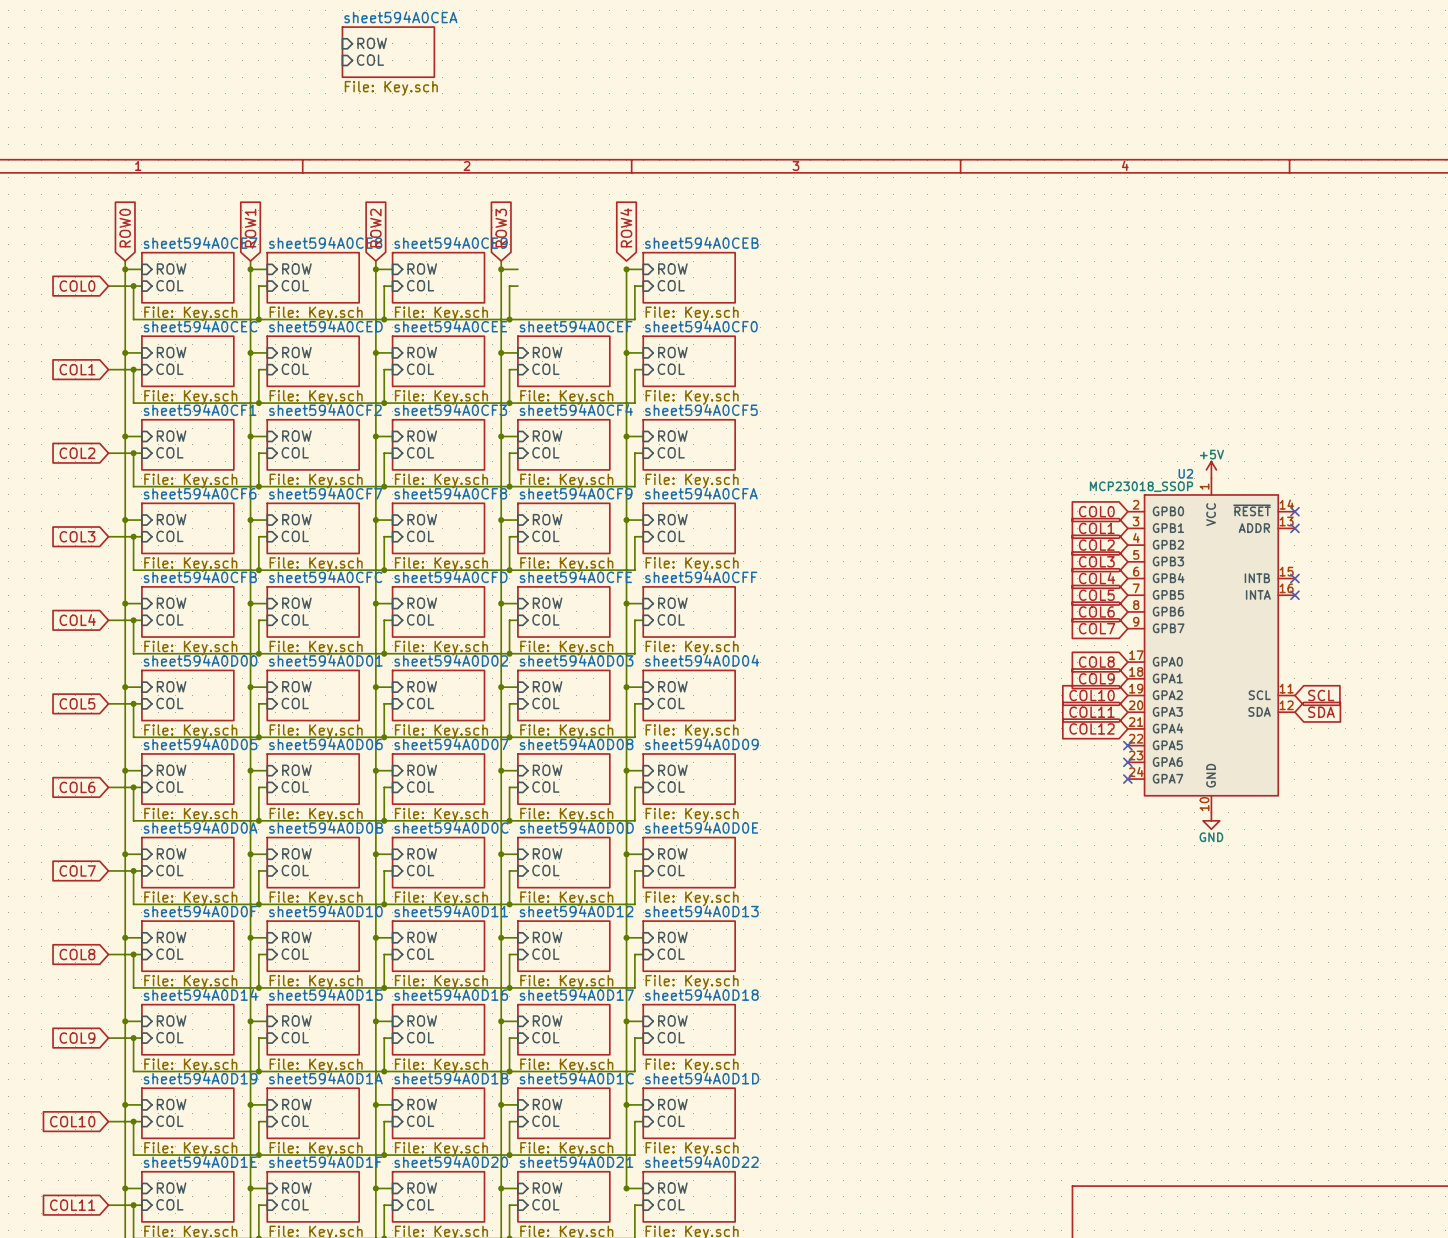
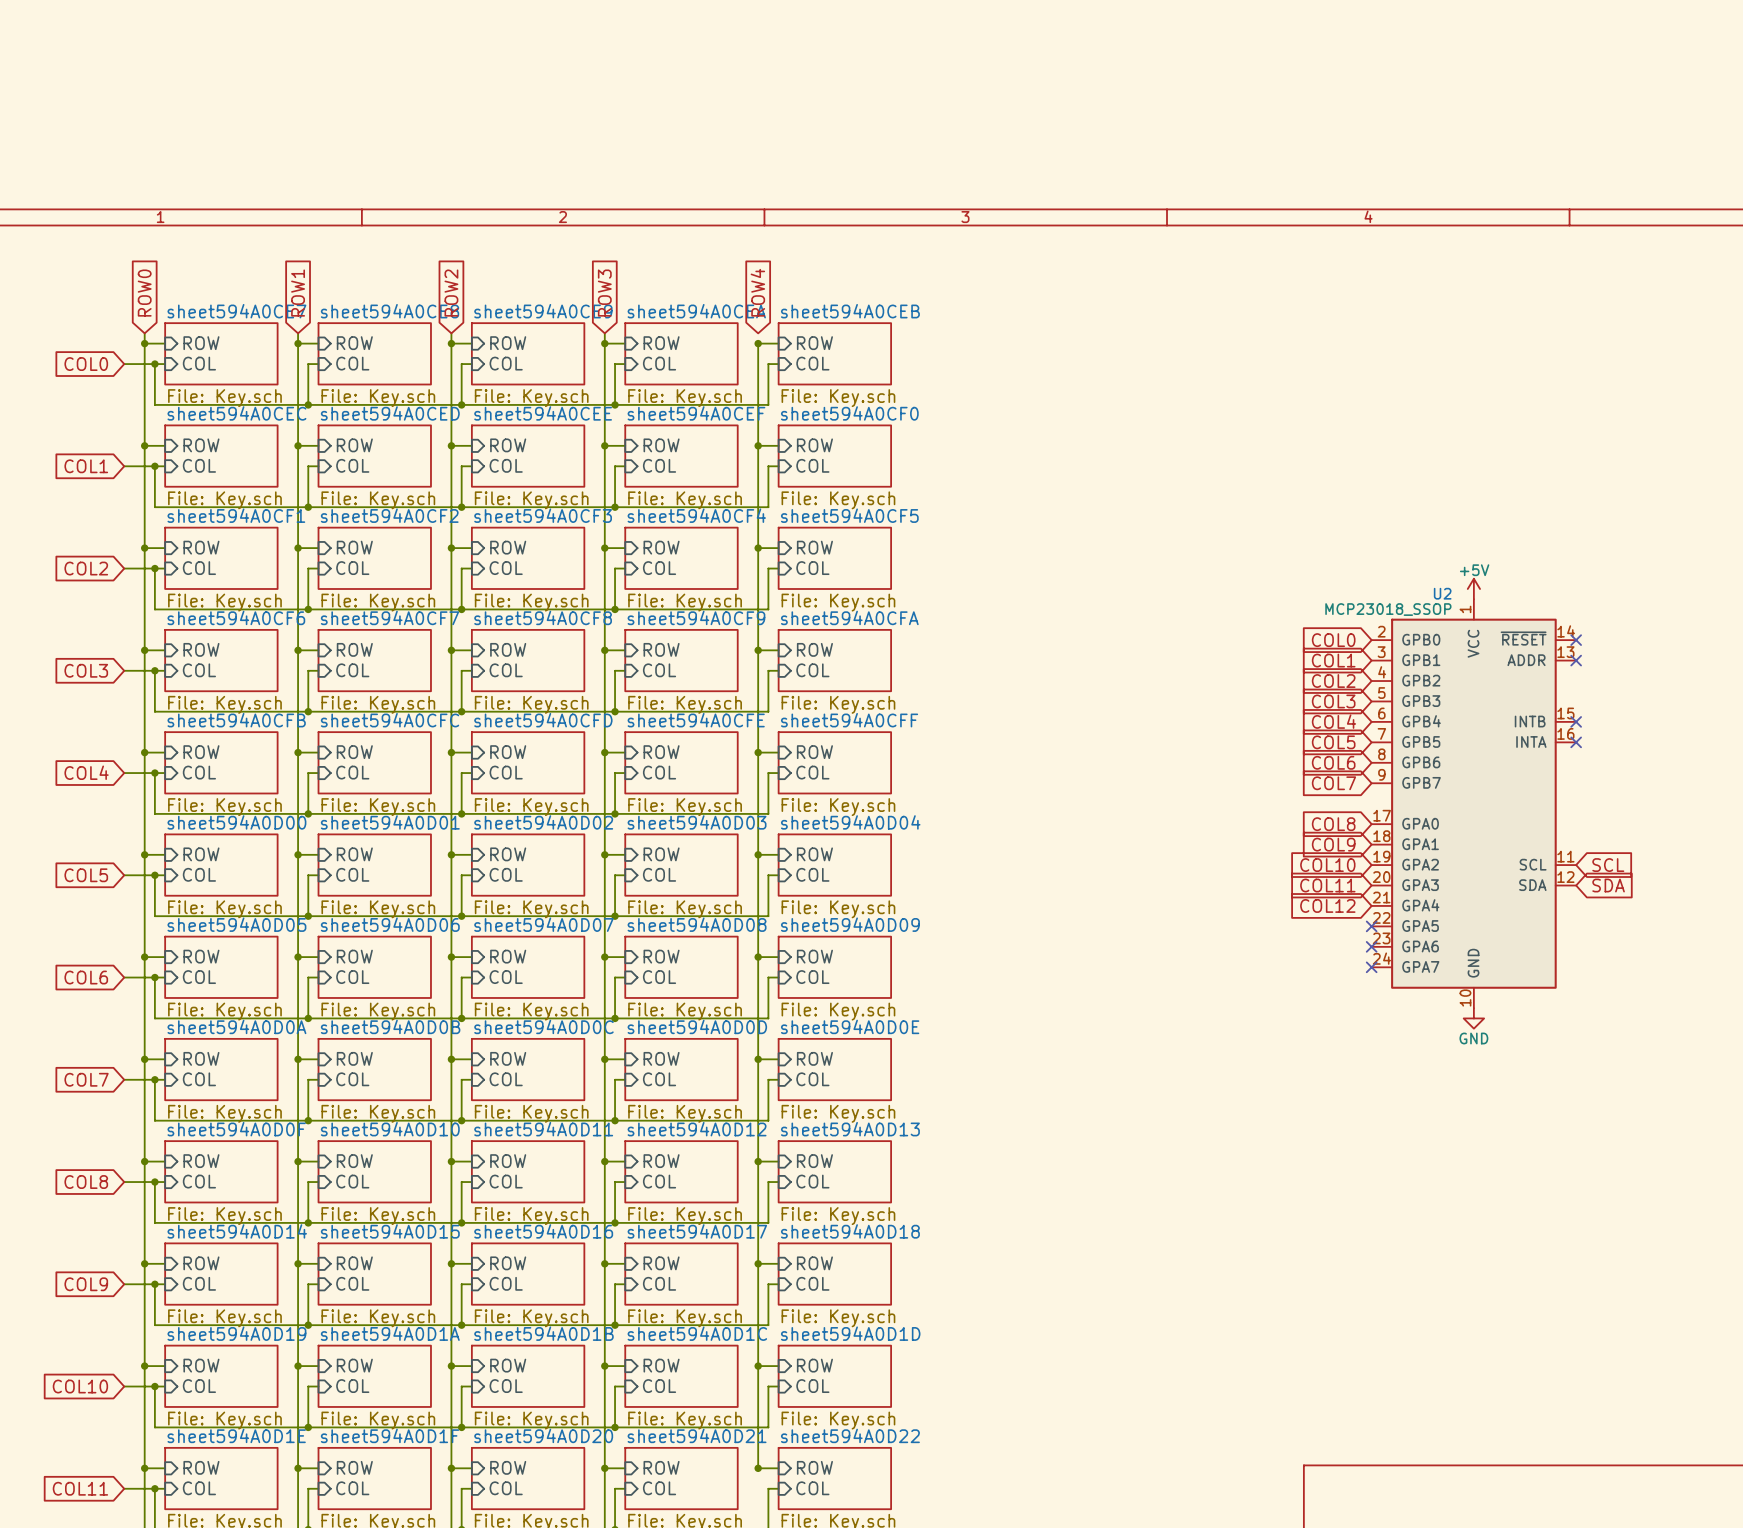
sheet pin: ROW (372, 43) -> none
sheet sheet594A0CEA position: (388, 52) -> (681, 353)
sheet pin: COL (370, 60) -> none
sheet pin: none -> ROW (661, 343)
sheet pin: none -> COL (659, 363)

